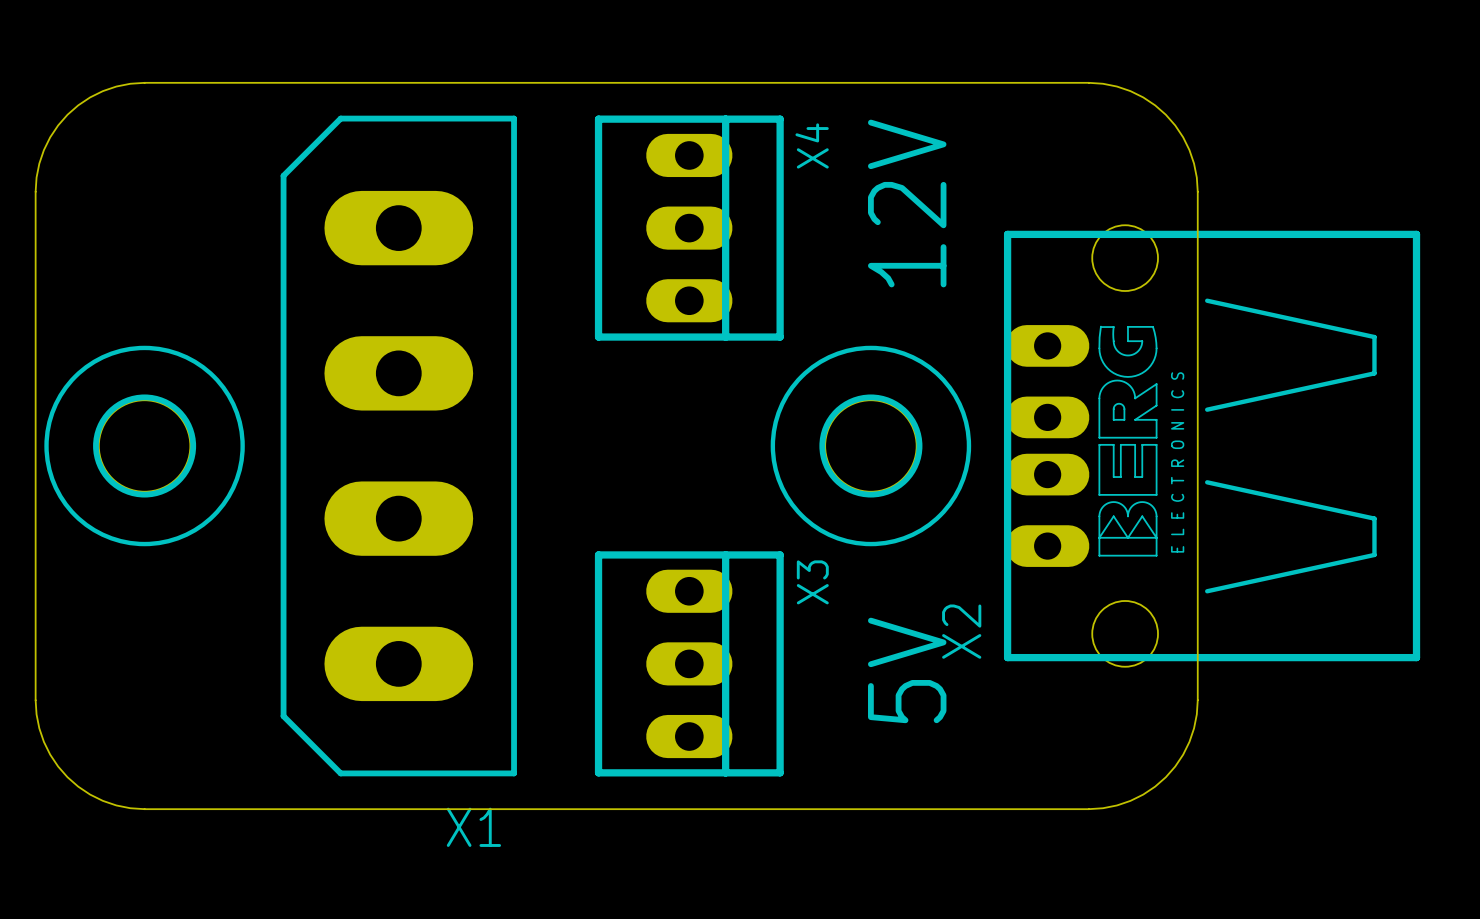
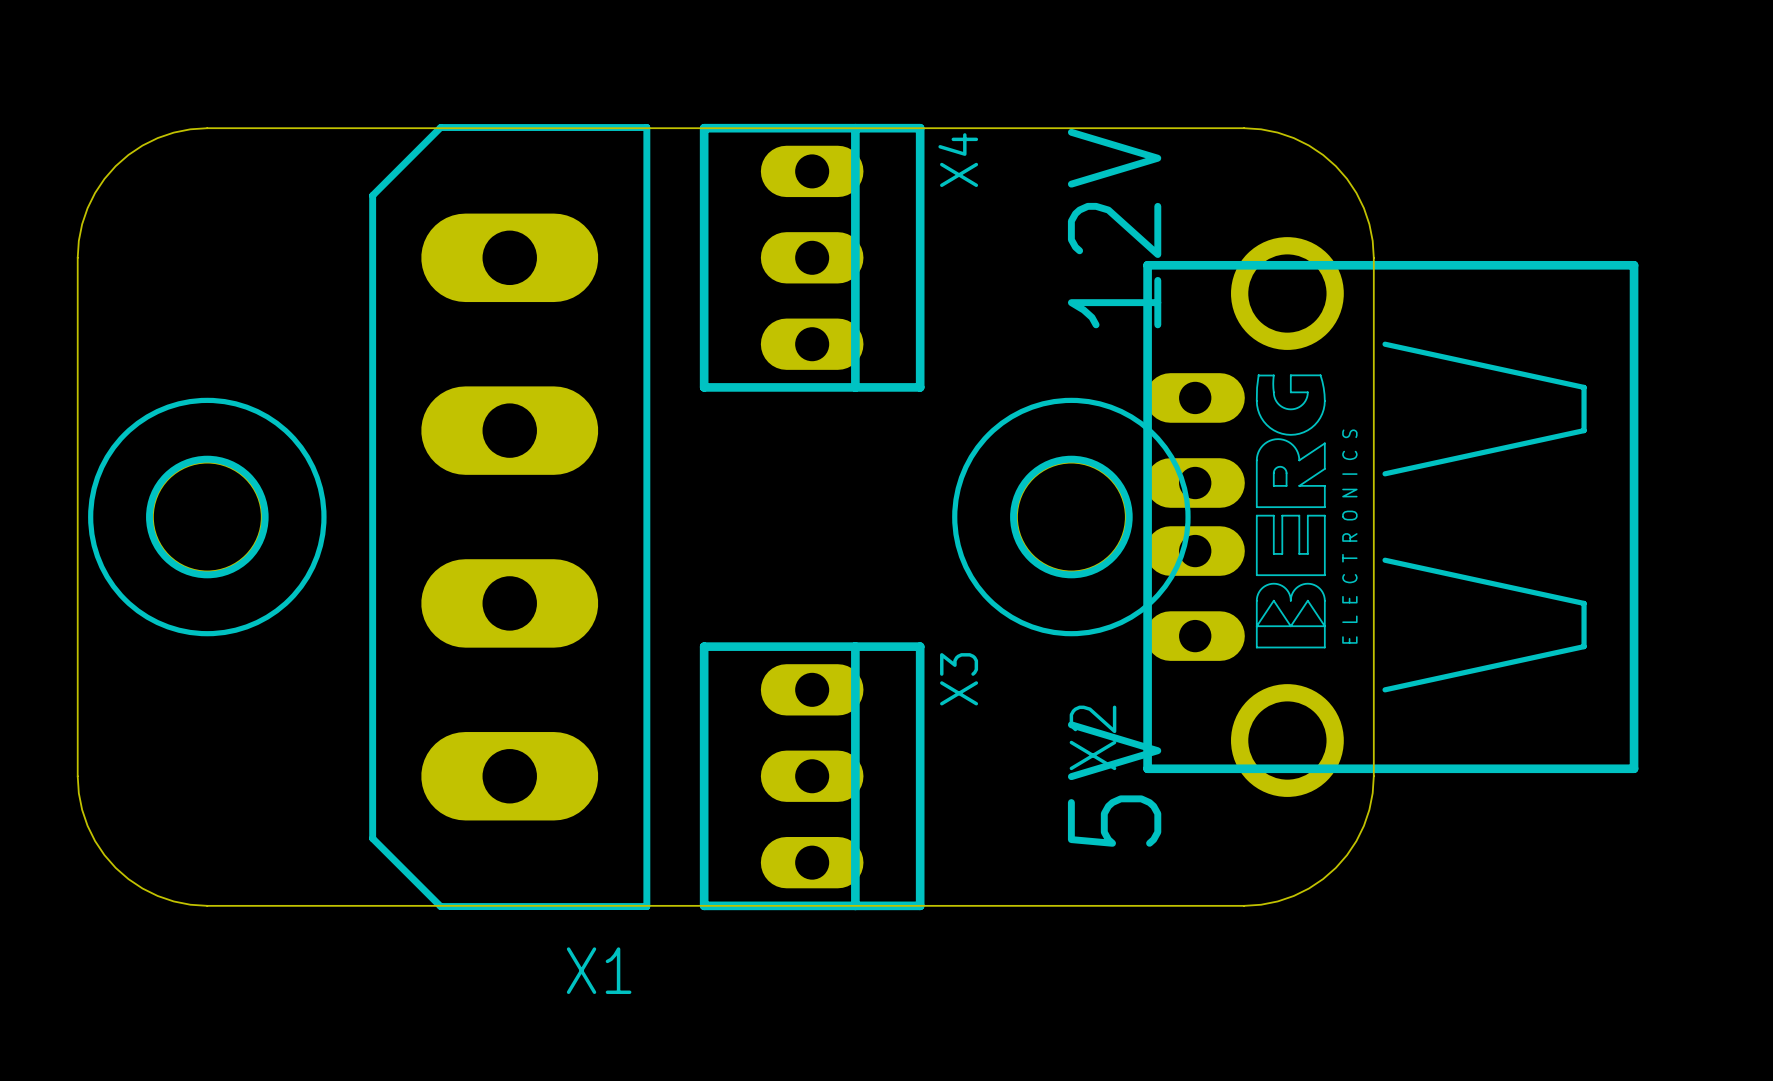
X2 footprint: [1003, 225, 1421, 667] -> [1143, 237, 1639, 797]
board edge: (35, 228) (35, 191) (39, 163) (50, 137) (58, 125) (67, 114) (90, 97) (116, 86) (144, 82) (1103, 83) (1117, 86) (1143, 97) (1165, 114) (1183, 137) (1189, 150) (1194, 163) (1197, 191) (1196, 714) (1189, 741) (1175, 766) (1155, 786) (1130, 800) (1117, 805) (1088, 809) (130, 808) (116, 805) (90, 794) (67, 777) (50, 754) (39, 728) (36, 714) (35, 663) -> (77, 257) (82, 224) (87, 208) (95, 193) (115, 166) (142, 145) (157, 138) (173, 132) (207, 128) (1261, 129) (1277, 132) (1309, 145) (1335, 166) (1356, 193) (1363, 208) (1369, 224) (1373, 257) (1372, 793) (1363, 825) (1347, 855) (1323, 879) (1293, 895) (1277, 901) (1244, 905) (190, 904) (173, 901) (142, 888) (115, 867) (95, 841) (87, 825) (82, 809) (77, 776)
X4 position: (689, 228) -> (812, 257)
X3 position: (689, 663) -> (812, 776)

